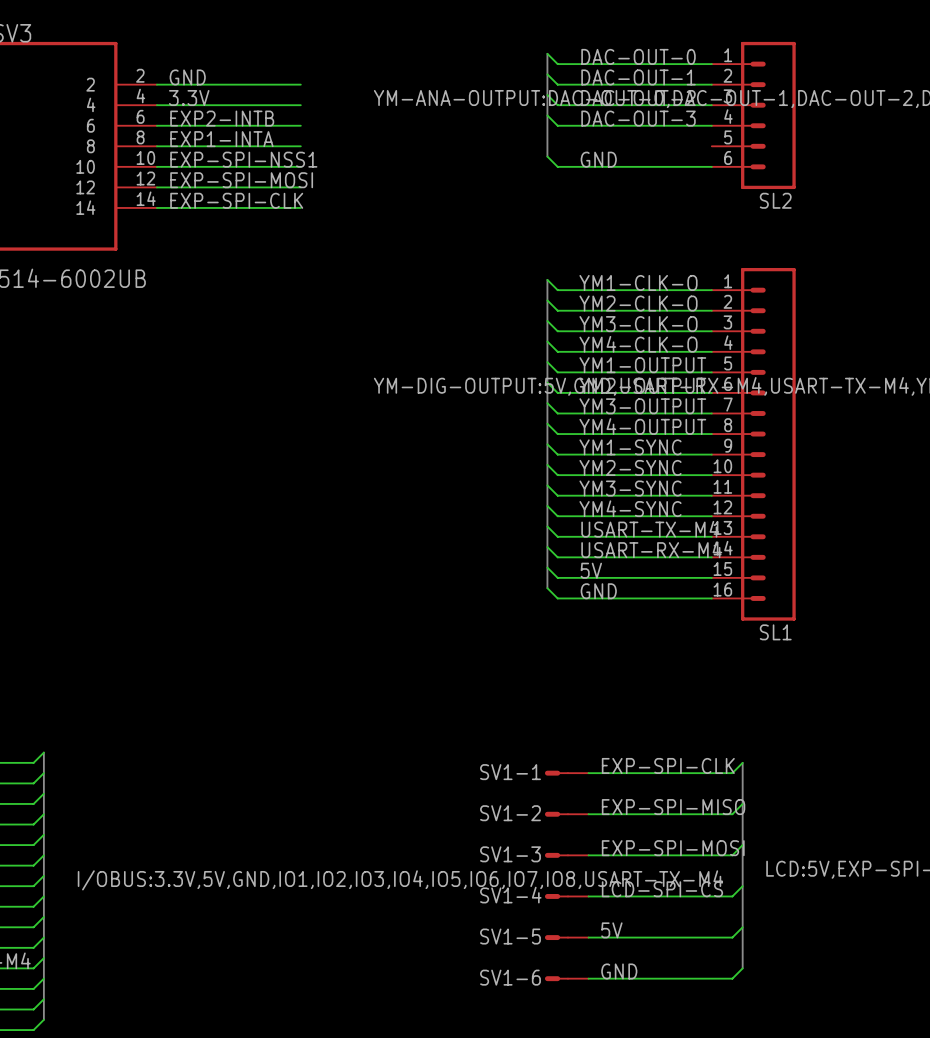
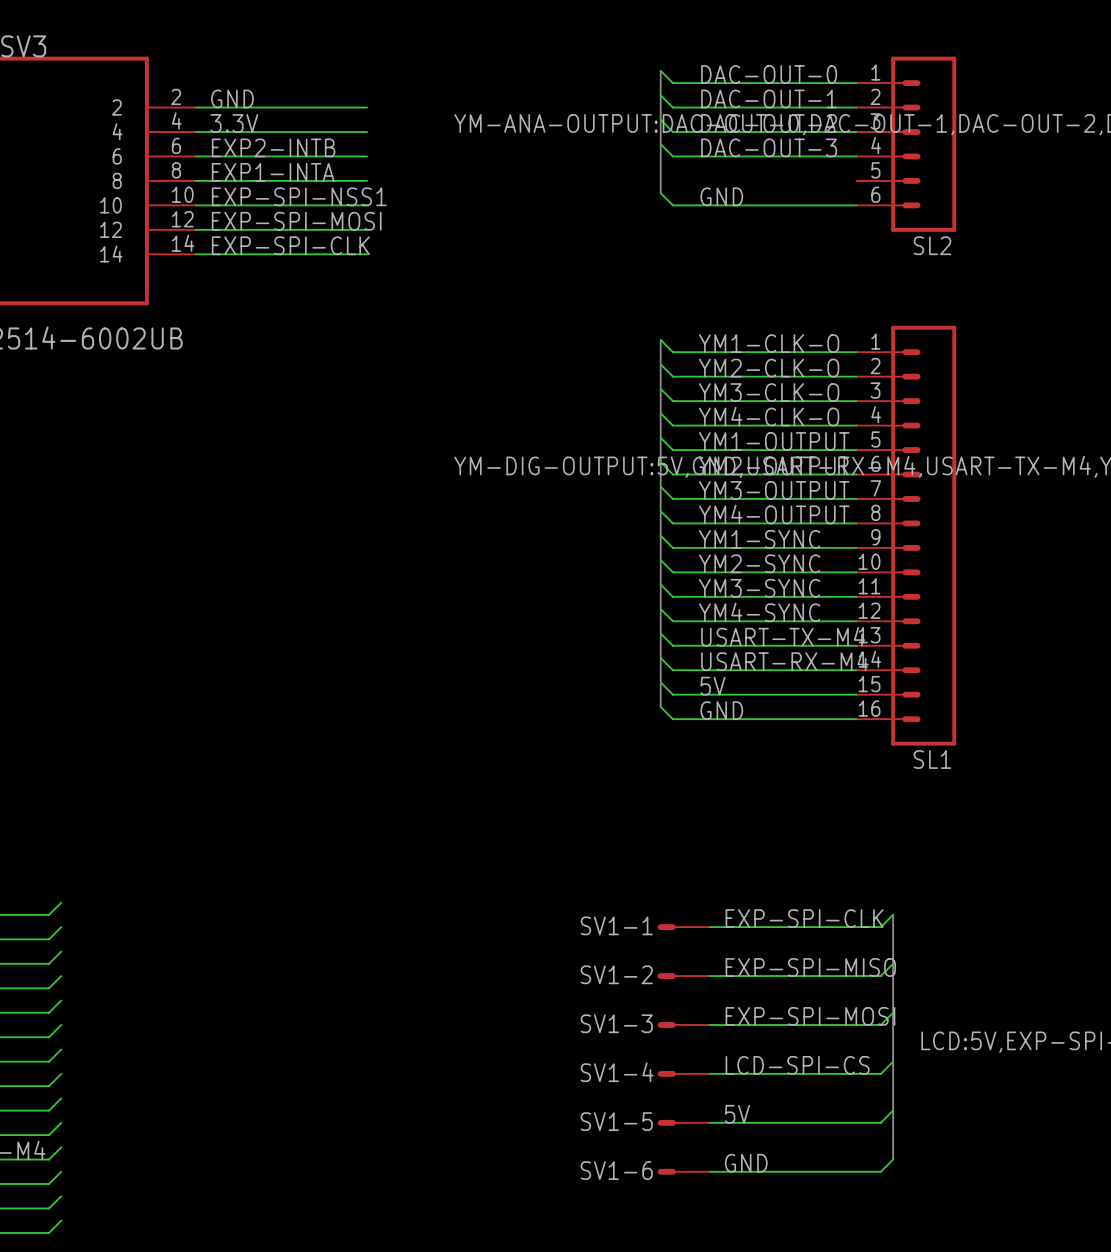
bus: (43, 752) (43, 1019) -> none
label: I/OBUS:3.3V,5V,GND,IO1,IO2,IO3,IO4,IO5,IO6,IO7,IO8,USART-TX-M4 (400, 880) -> none

